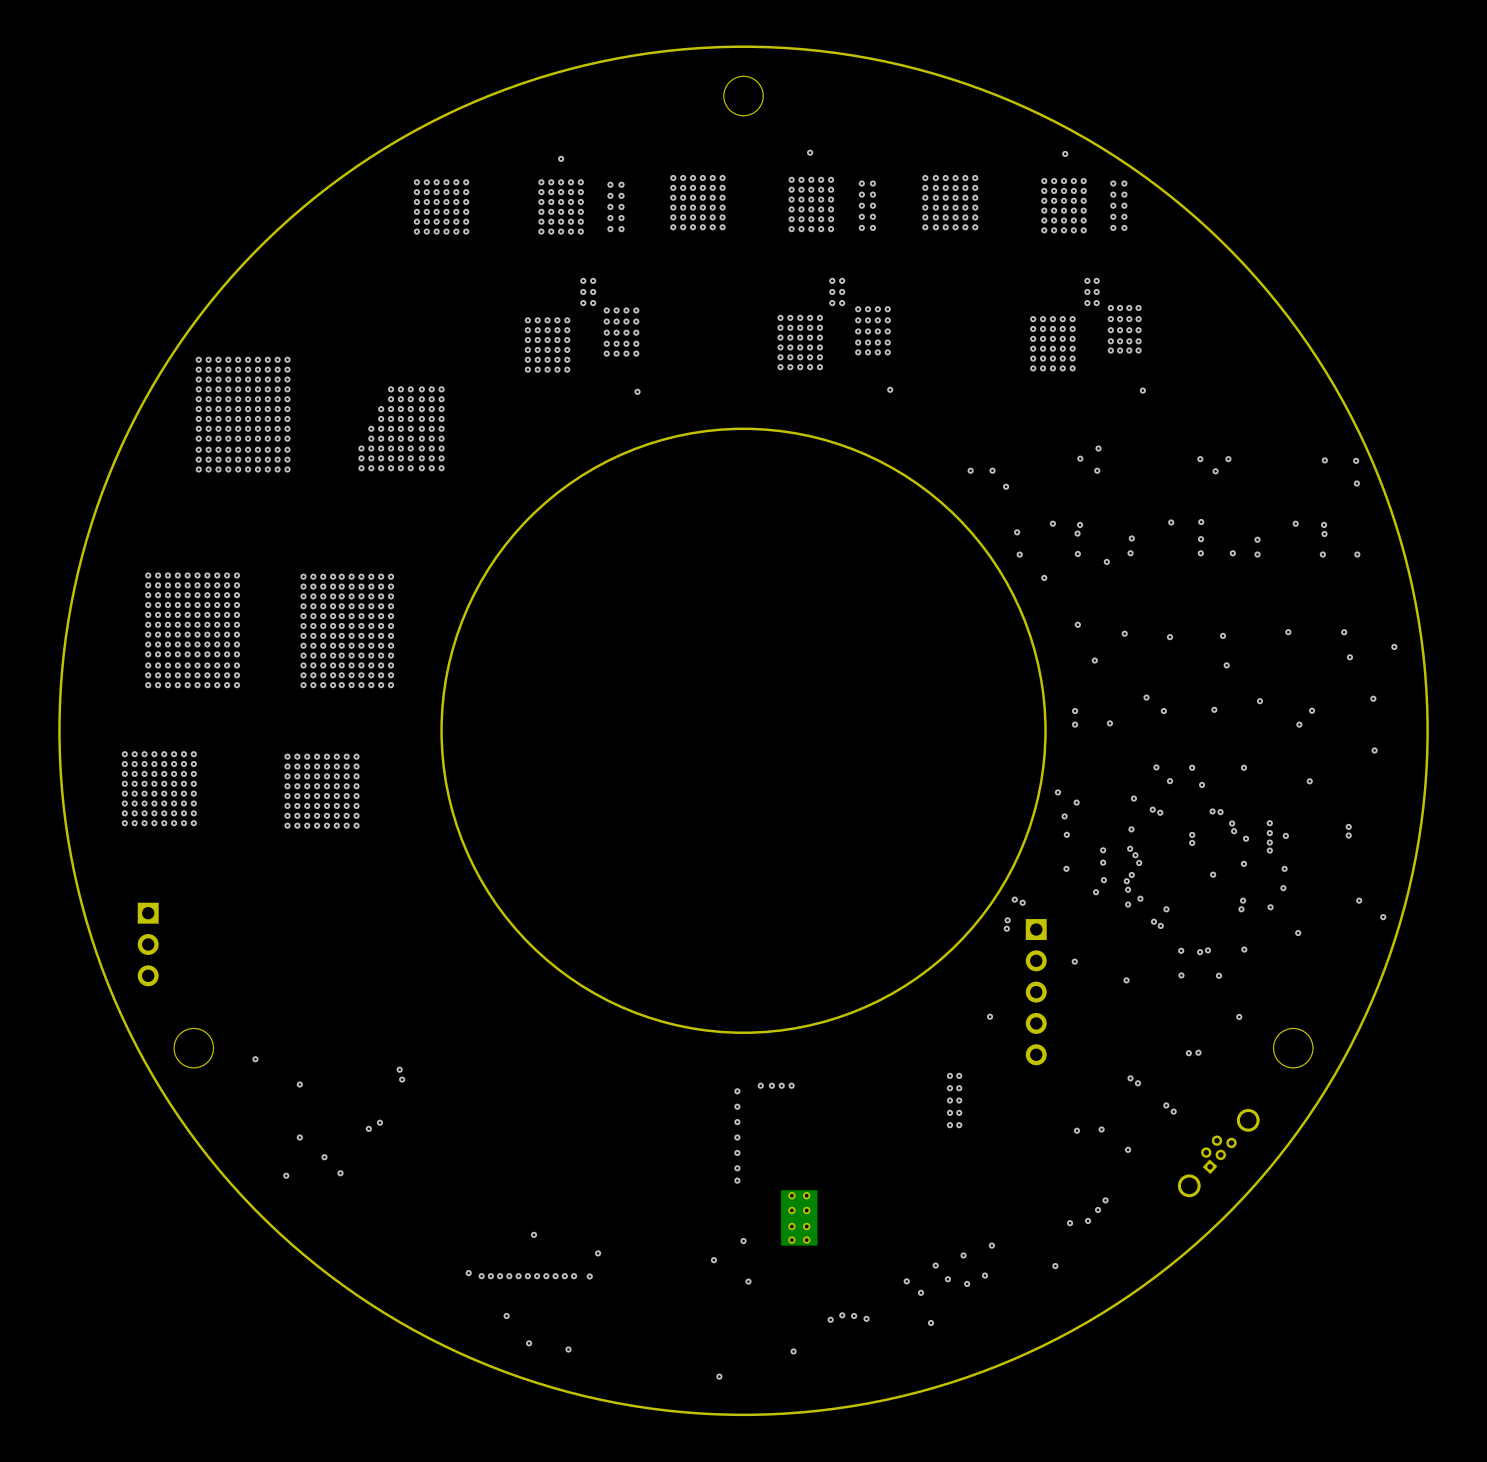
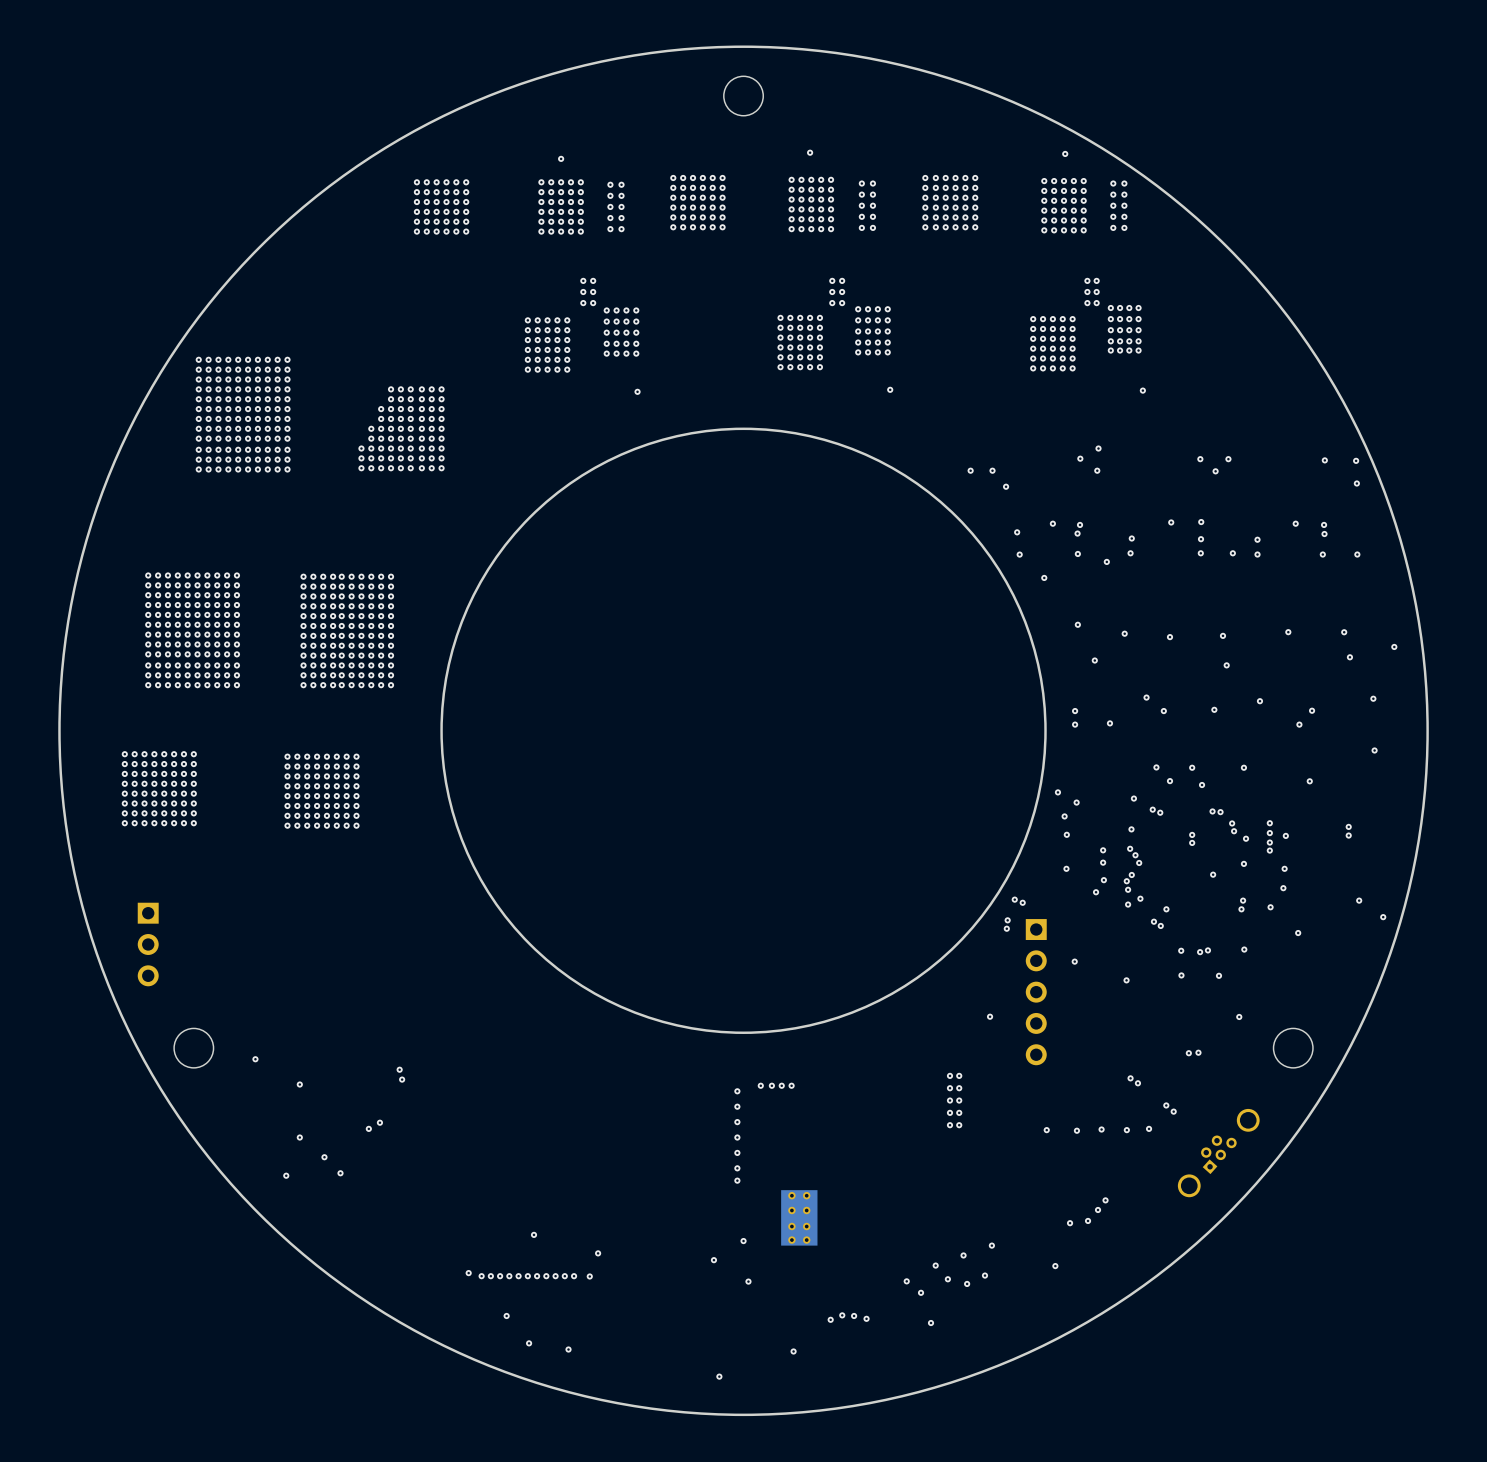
via: none -> (1149, 1128)
via: none -> (1046, 1130)
via: none -> (1126, 1130)
via: (1128, 1149) -> none

